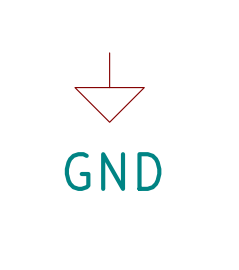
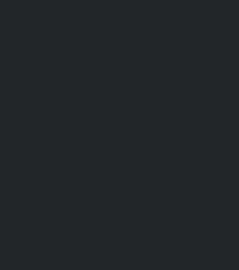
power symbol: GND (109, 87) -> none

